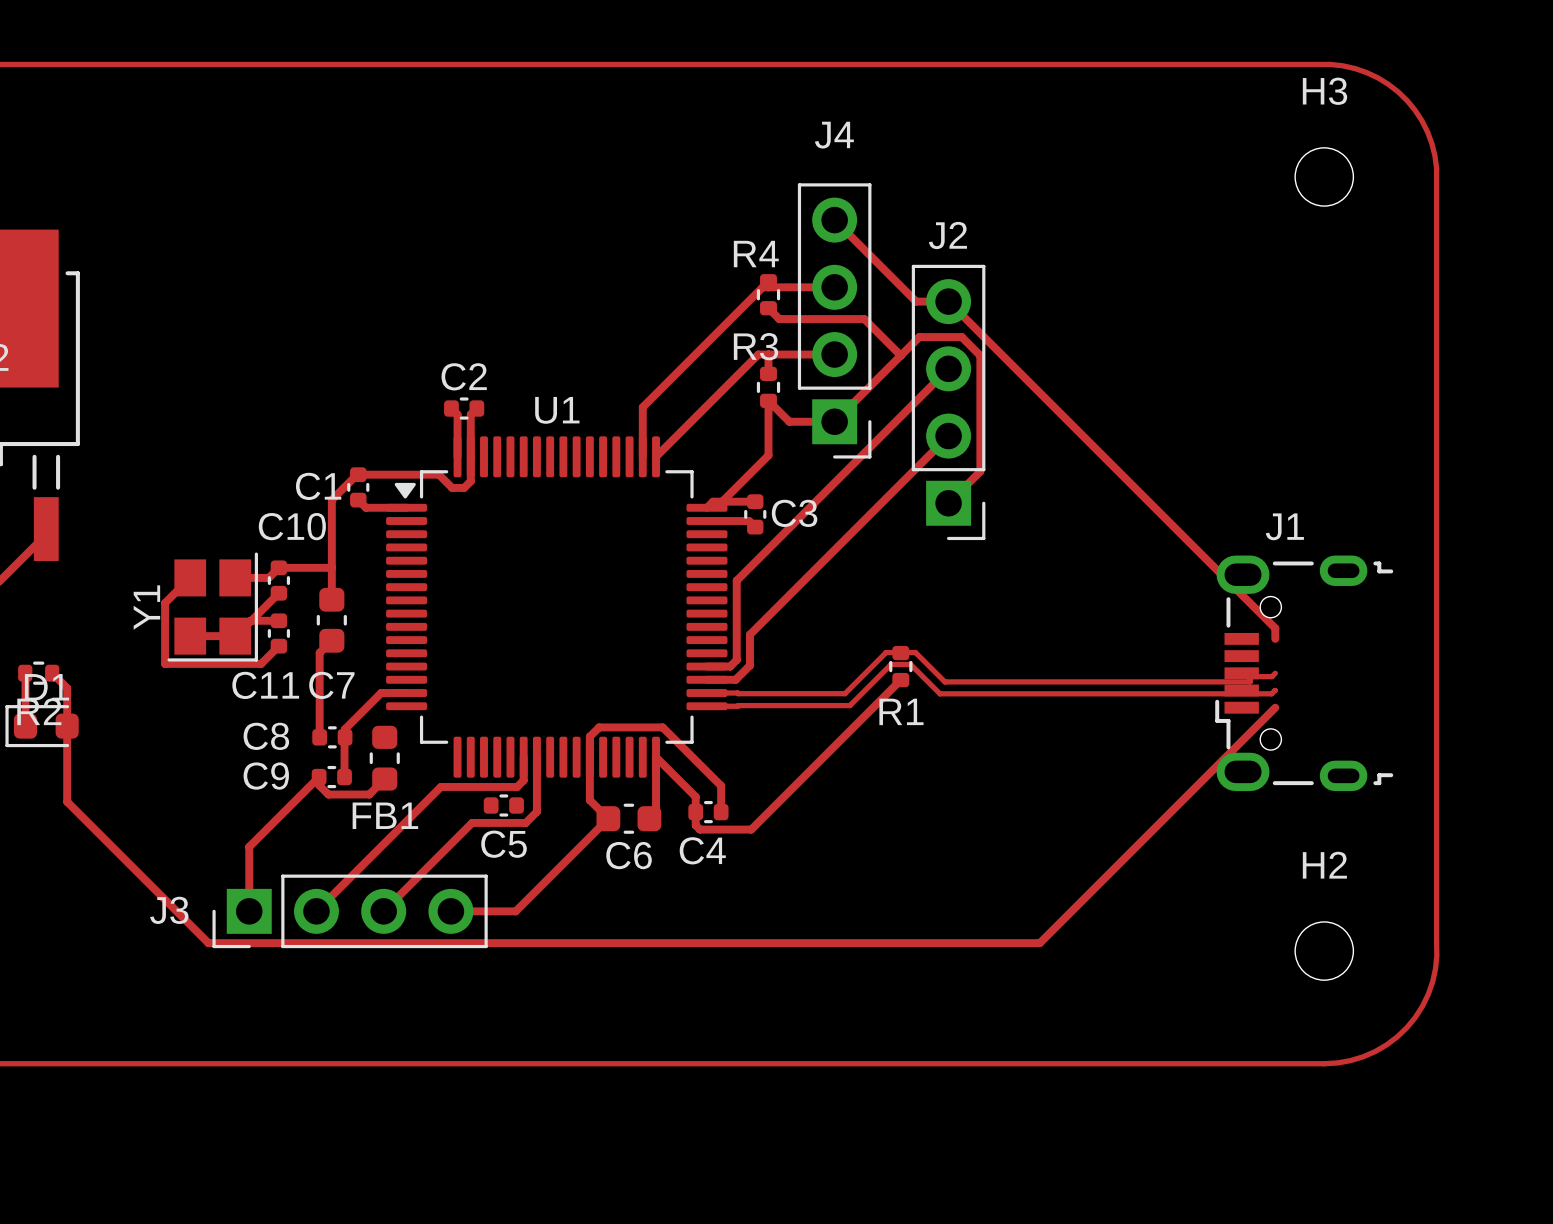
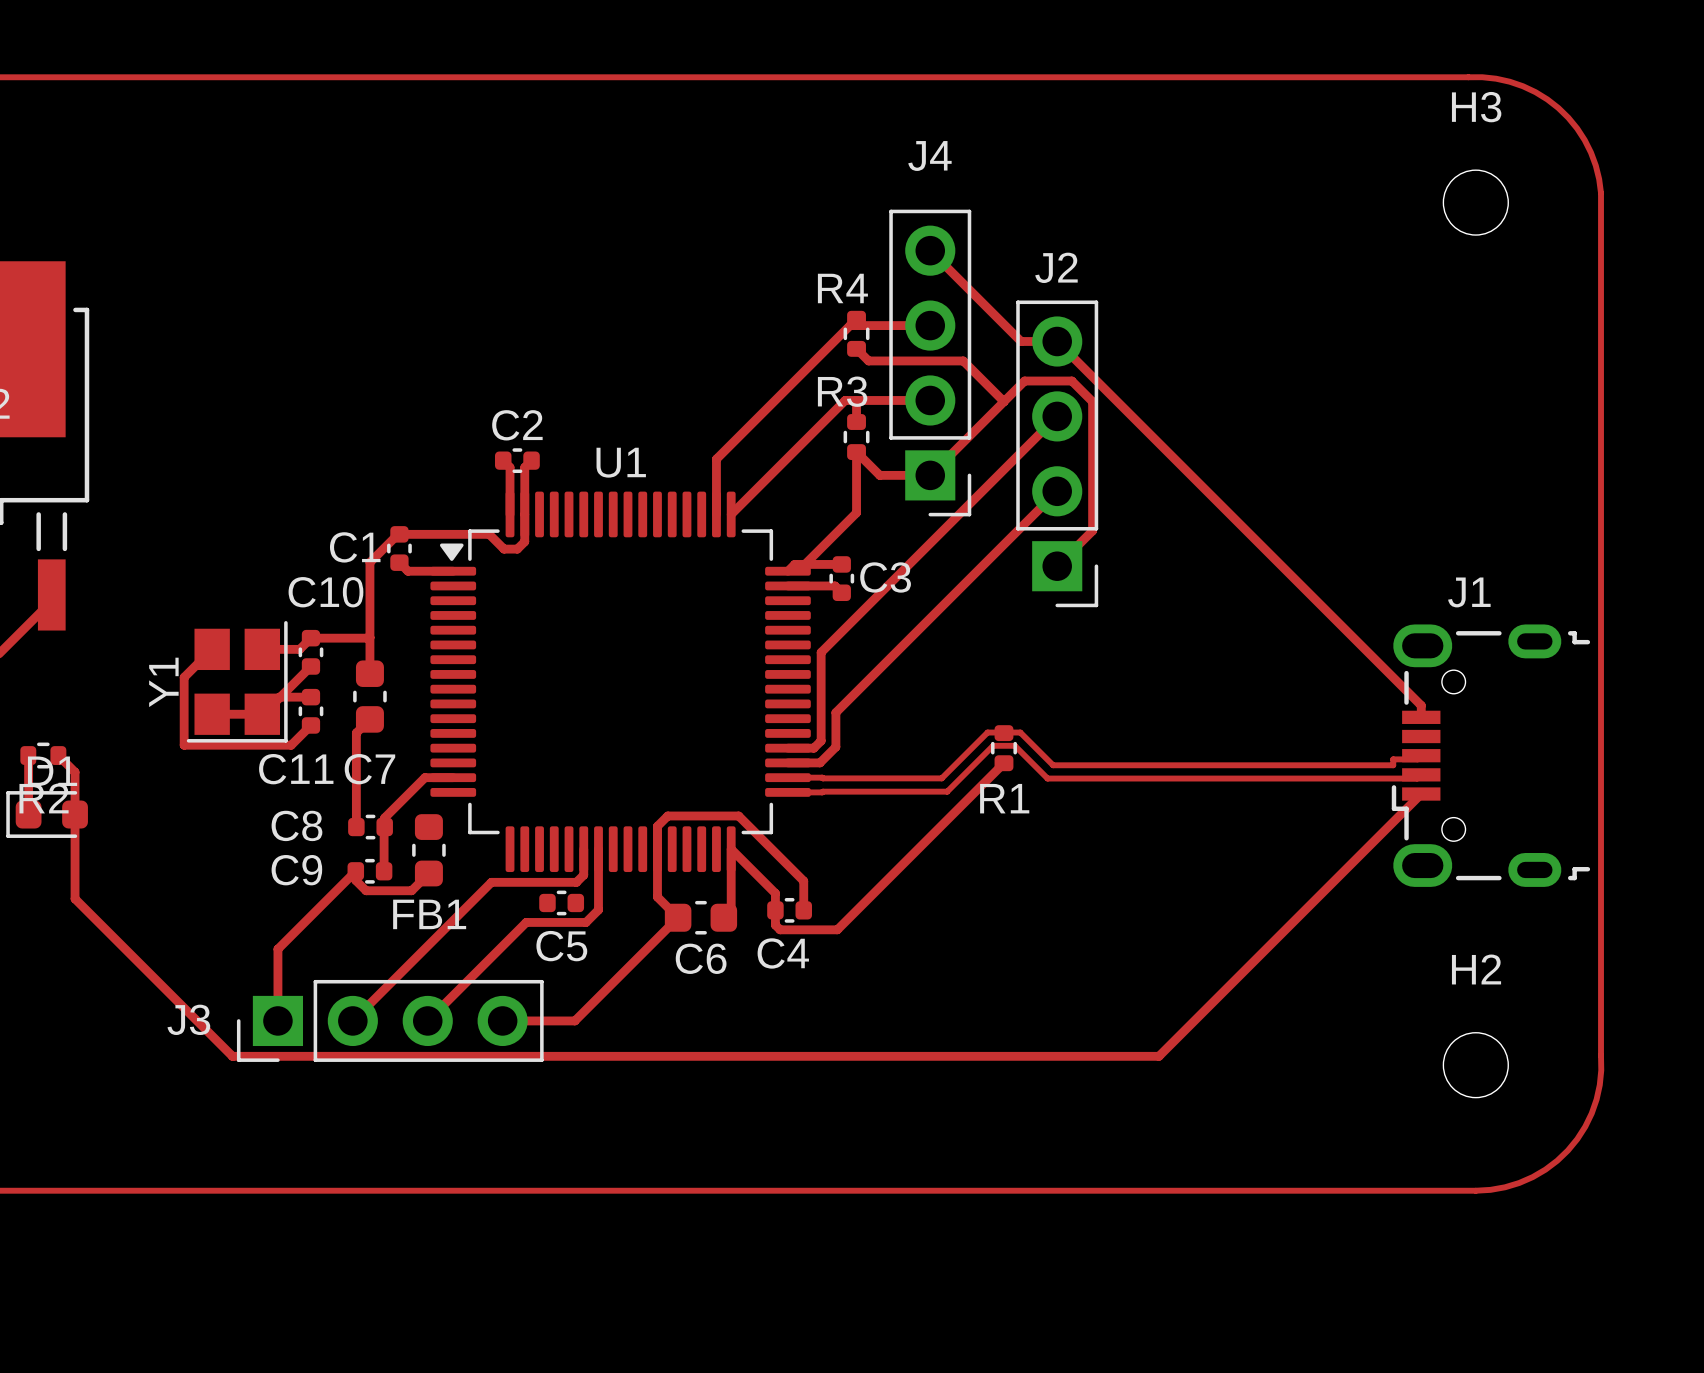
J1 position: (1304, 673) -> (1490, 755)

